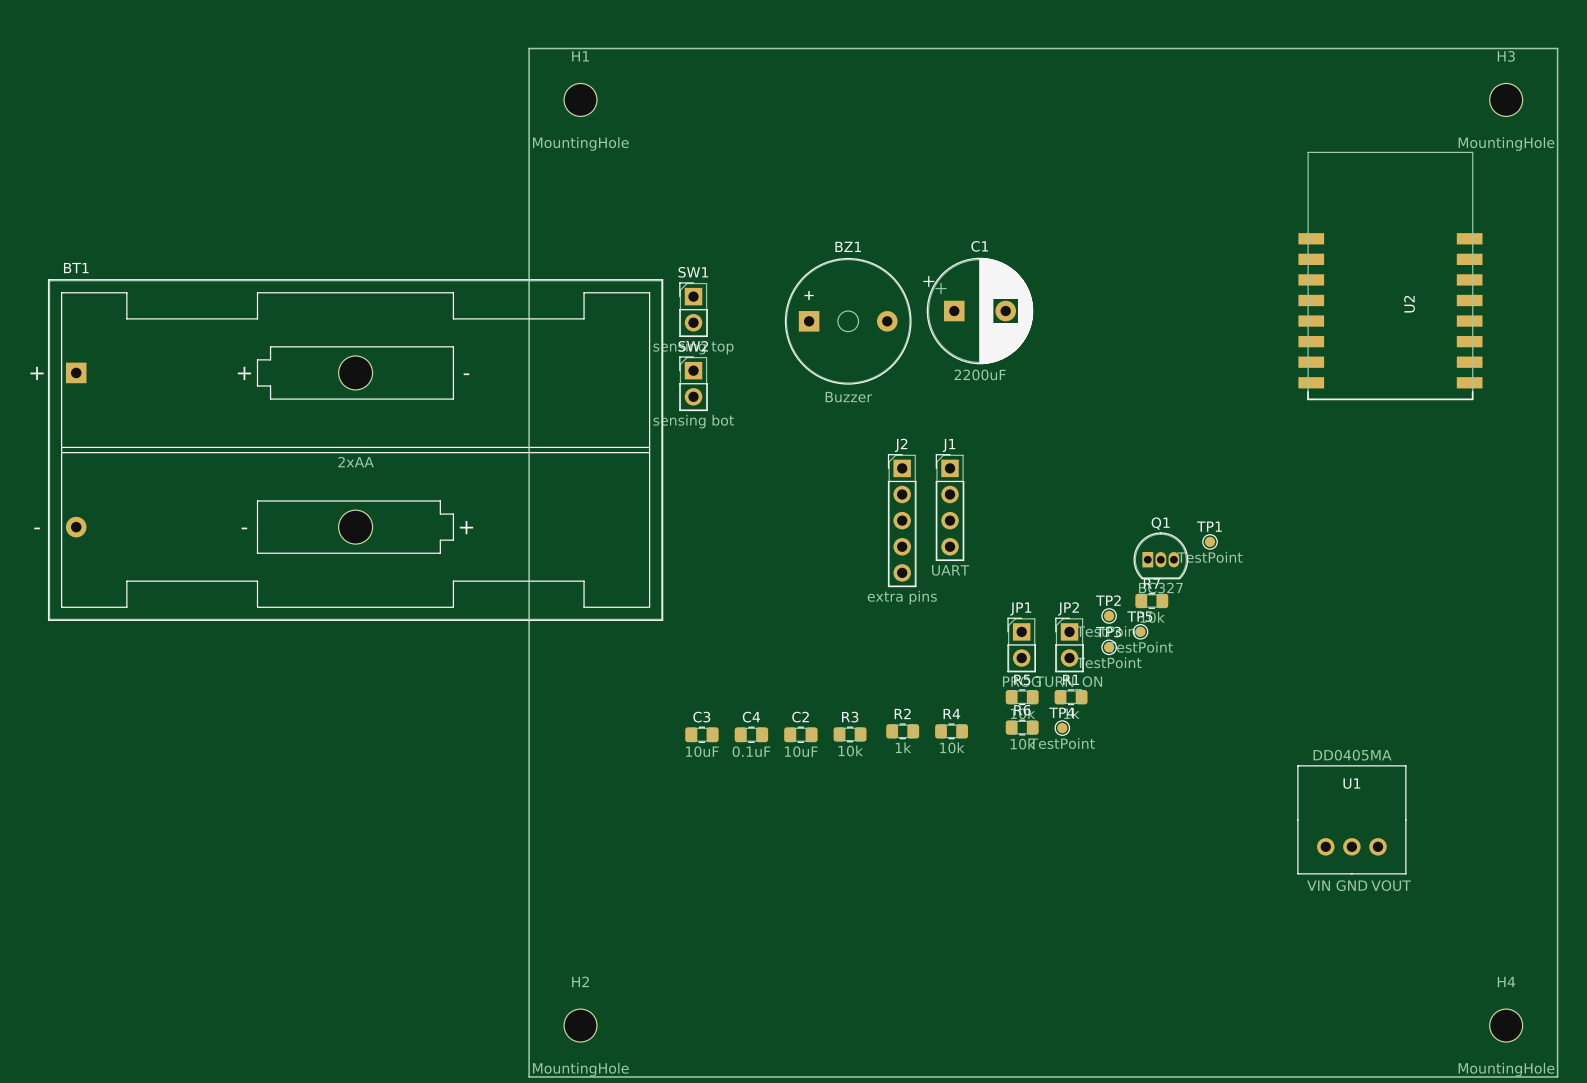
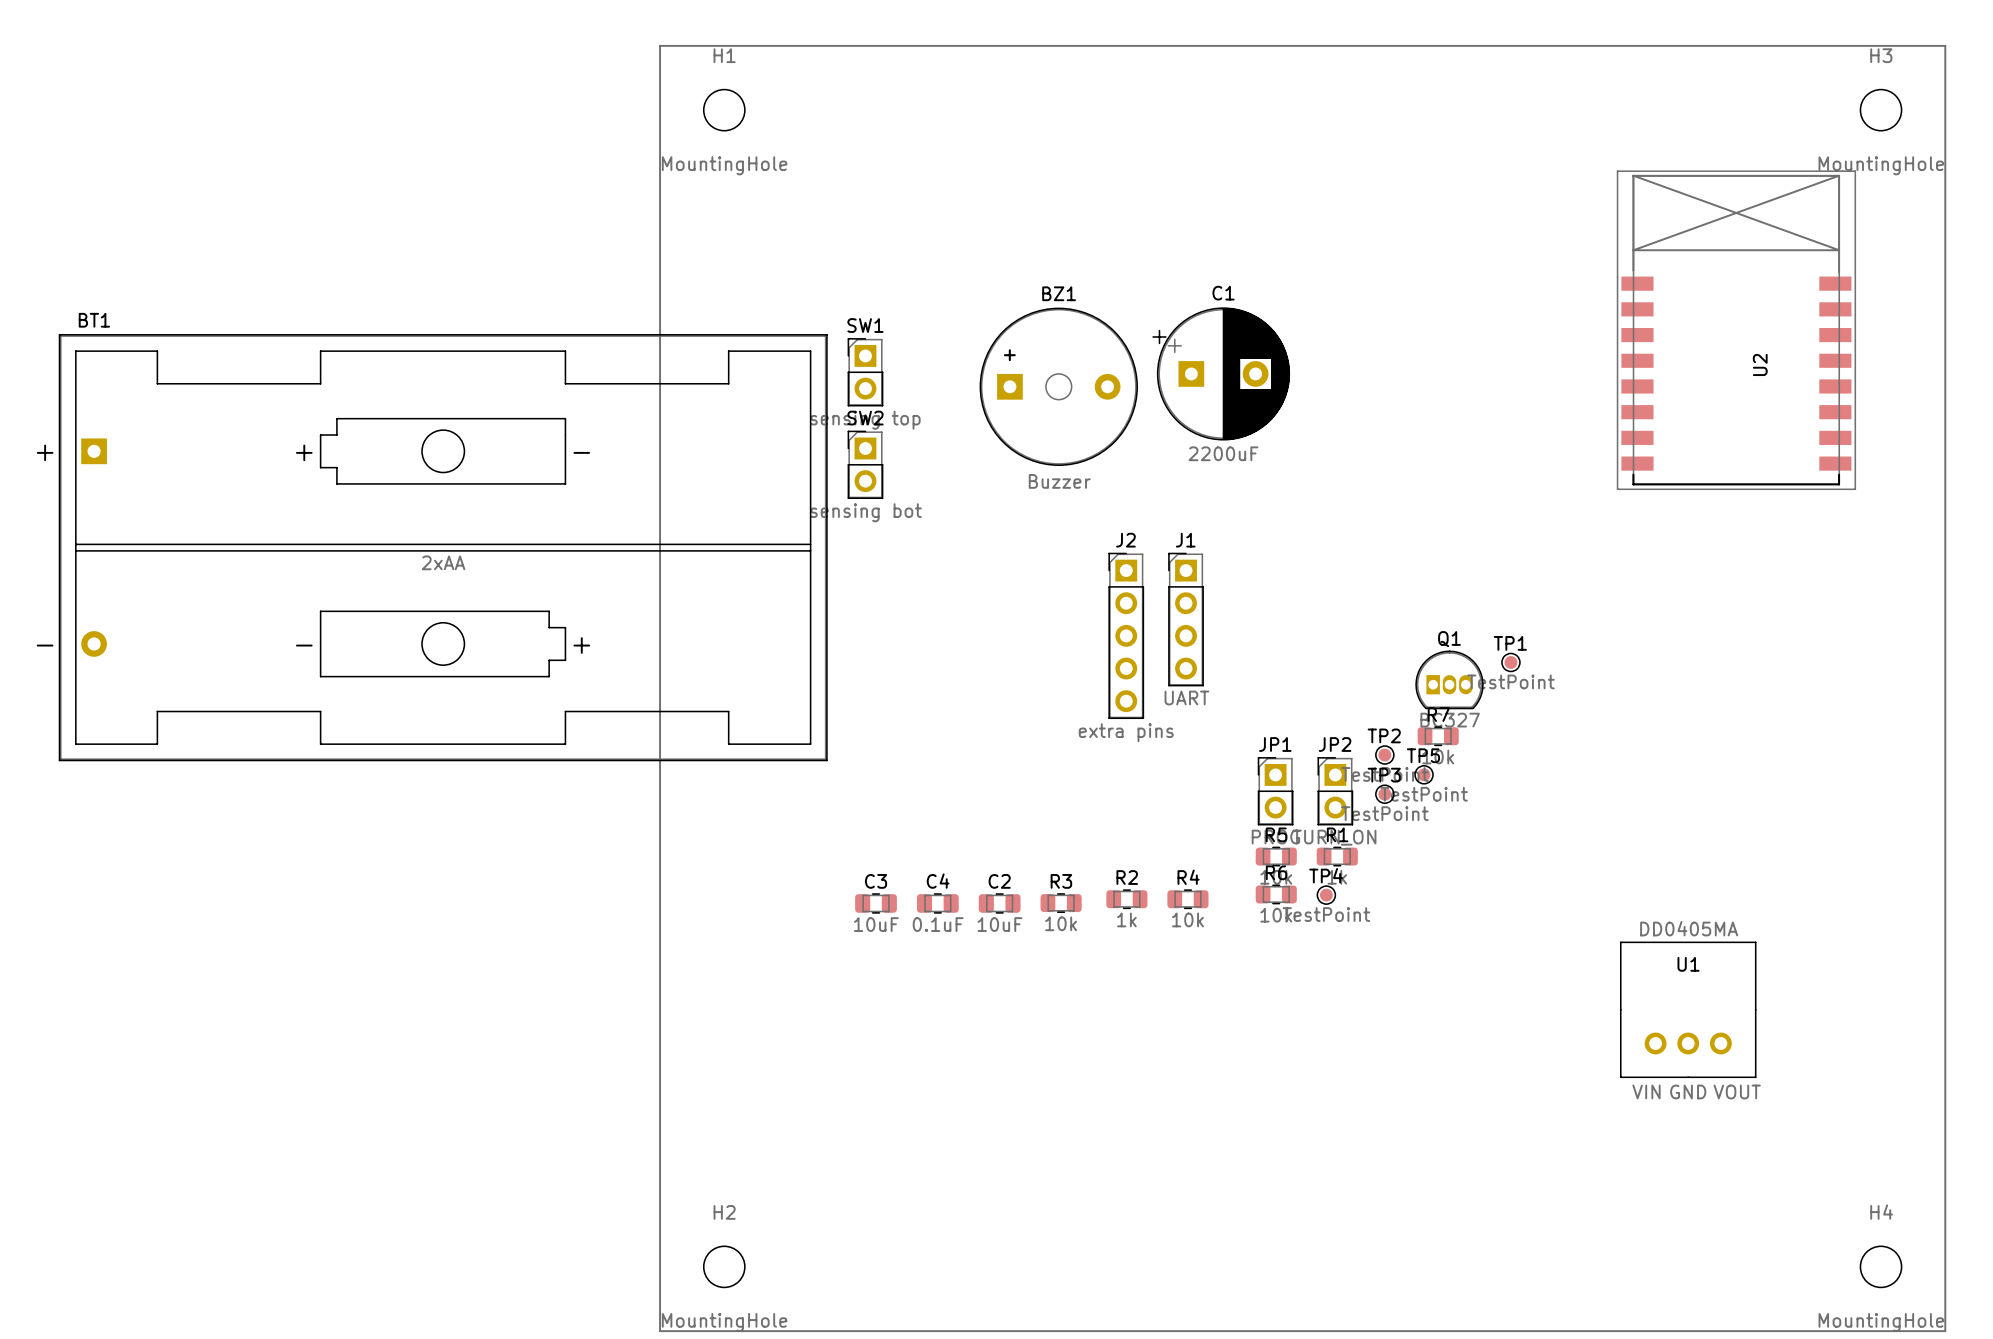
U2 footprint: [1298, 152, 1483, 401] -> [1617, 170, 1856, 490]

